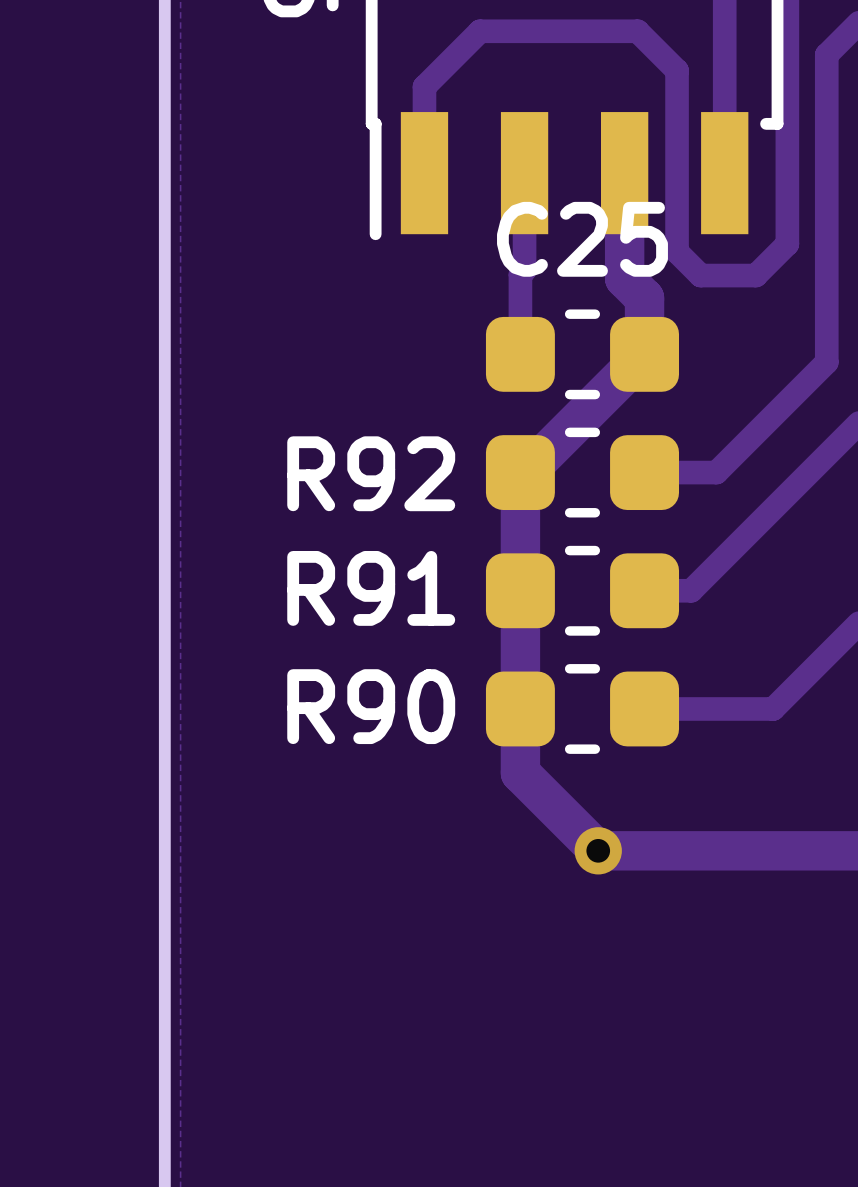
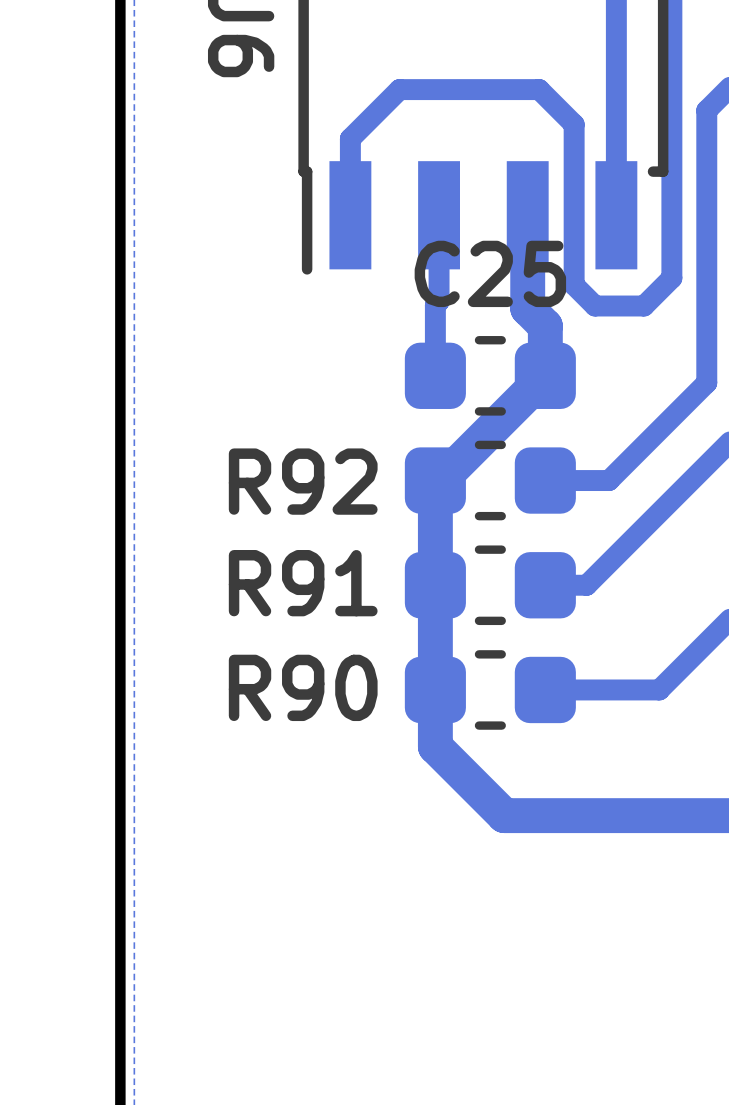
via: (598, 850) -> none

